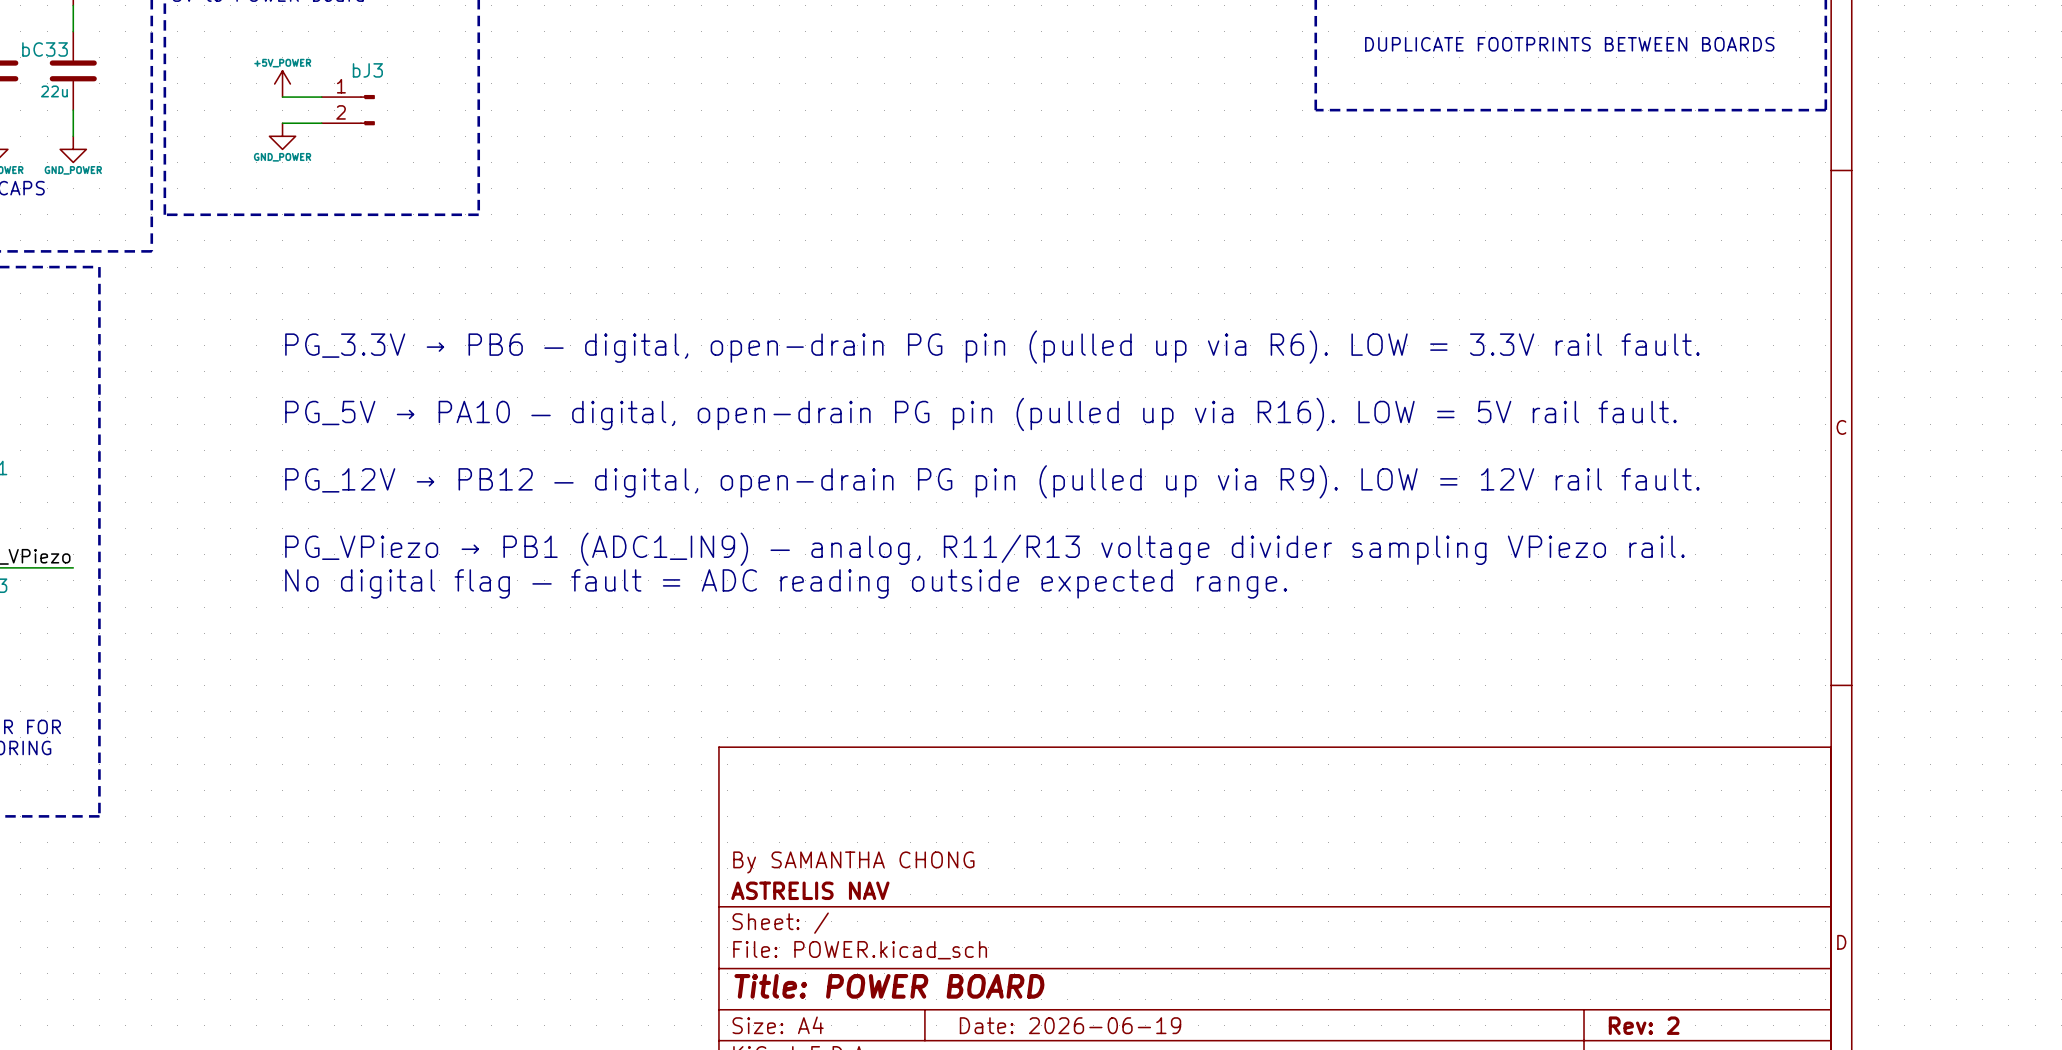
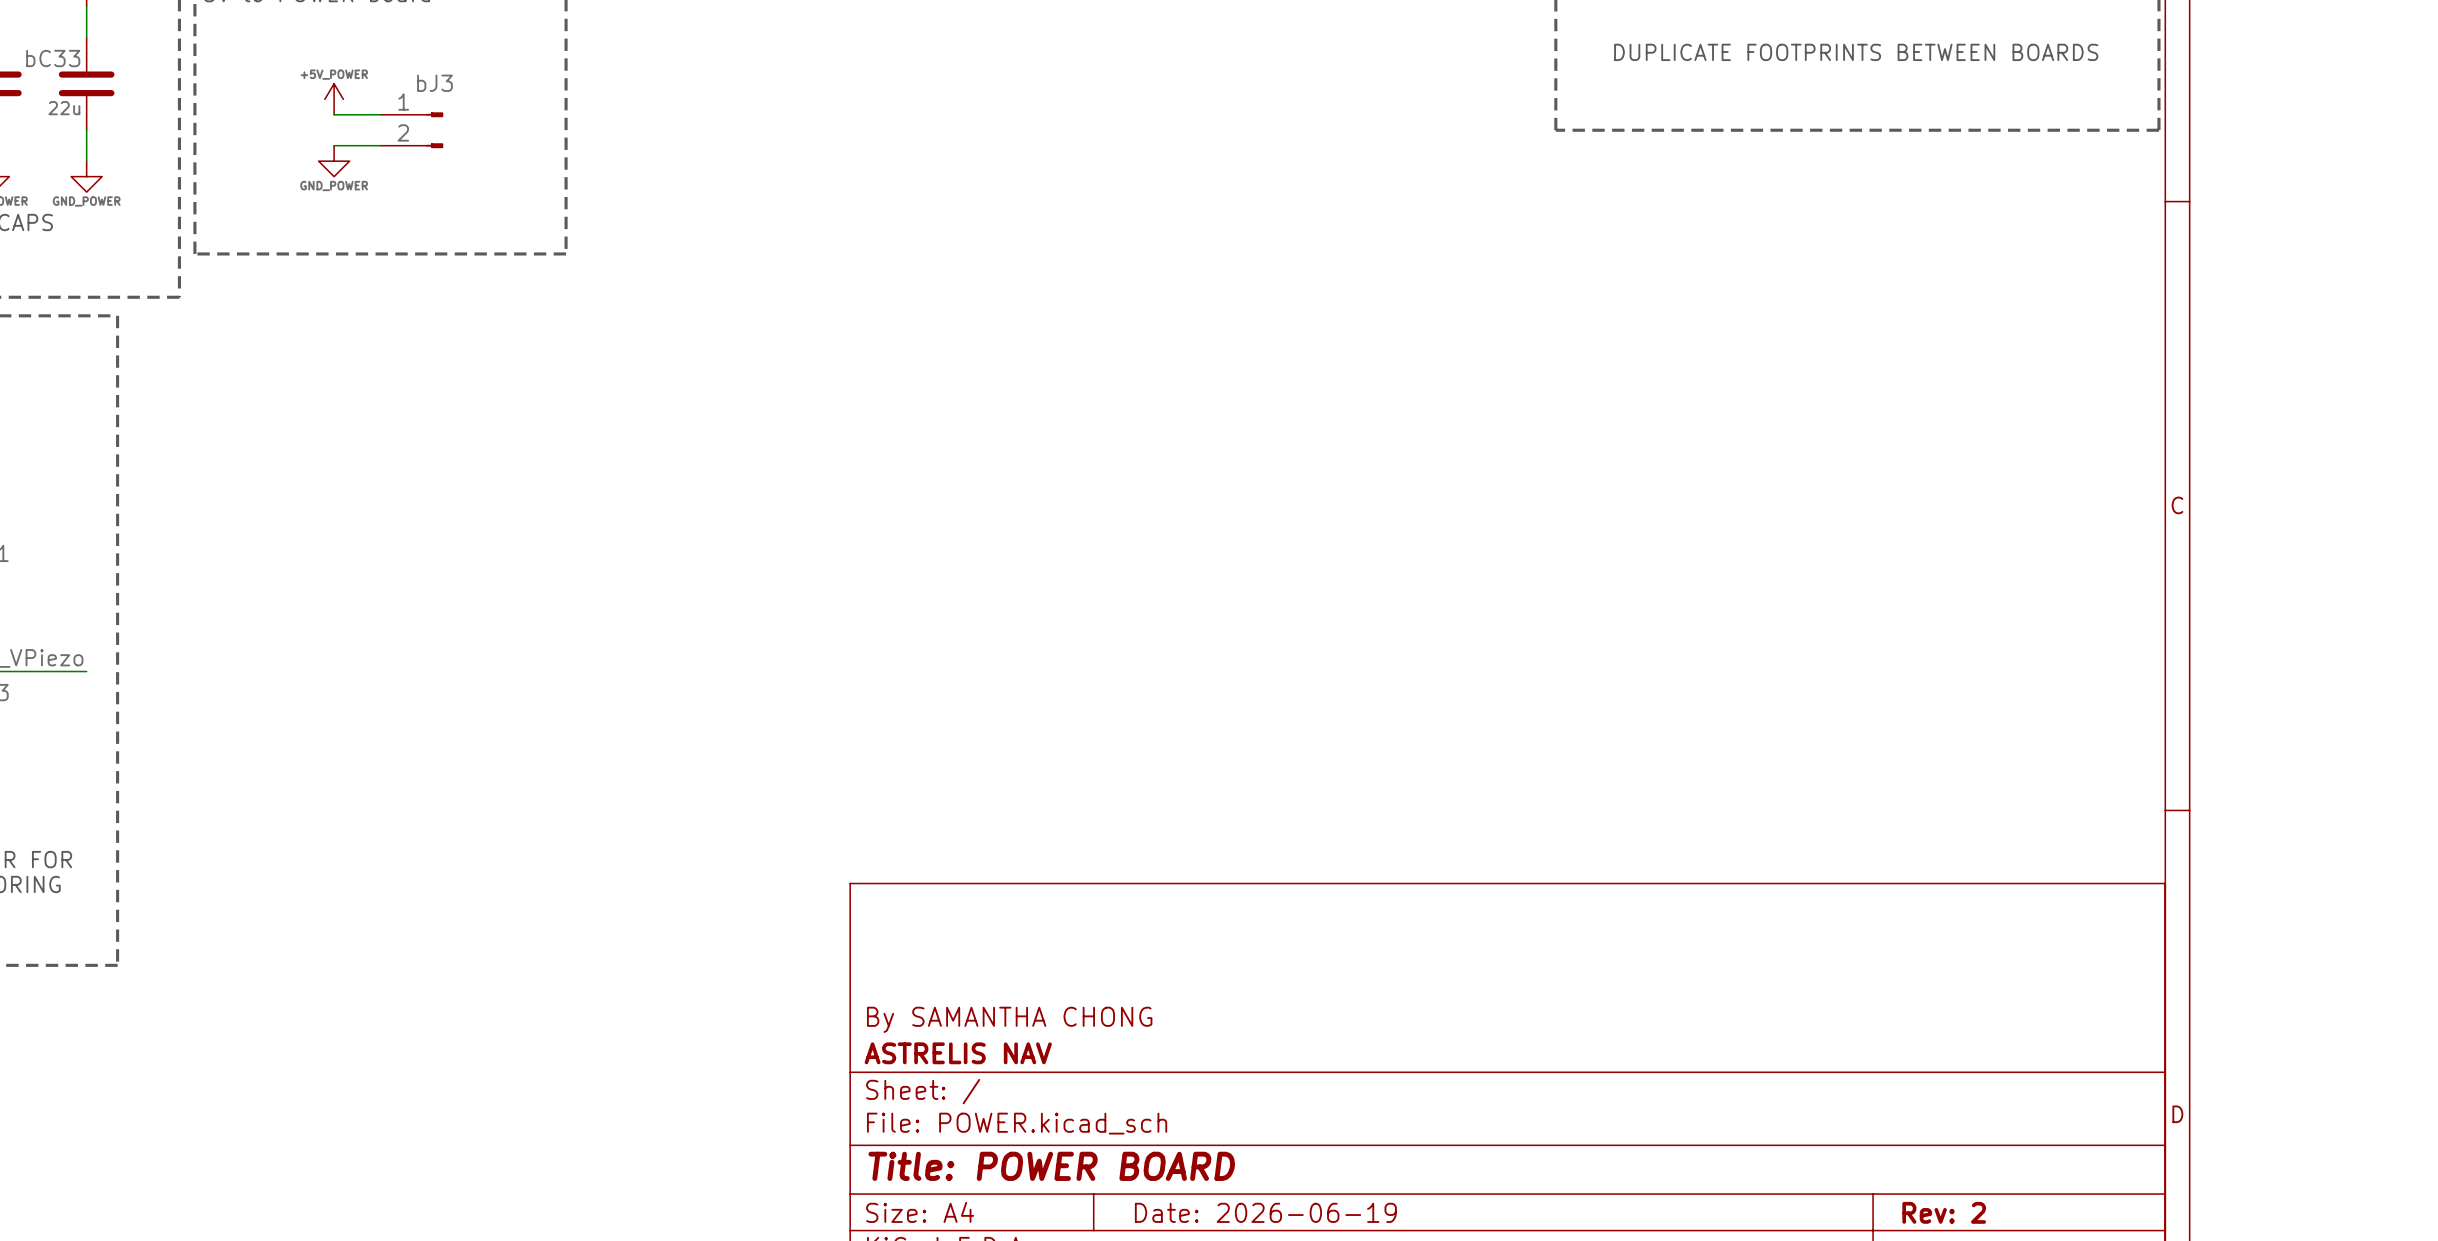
text: PG_3.3V → PB6 — digital, open-drain PG pin (pulled up via R6). LOW = 3.3V rail fault. (992, 347) -> none
text: PG_5V → PA10 — digital, open-drain PG pin (pulled up via R16). LOW = 5V rail fault. (980, 414) -> none
text: PG_12V → PB12 — digital, open-drain PG pin (pulled up via R9). LOW = 12V rail fault. (992, 481) -> none
text: PG_VPiezo → PB1 (ADC1_IN9) — analog, R11/R13 voltage divider sampling VPiezo rail. (984, 549) -> none
text: No digital flag — fault = ADC reading outside expected range. (786, 583) -> none

